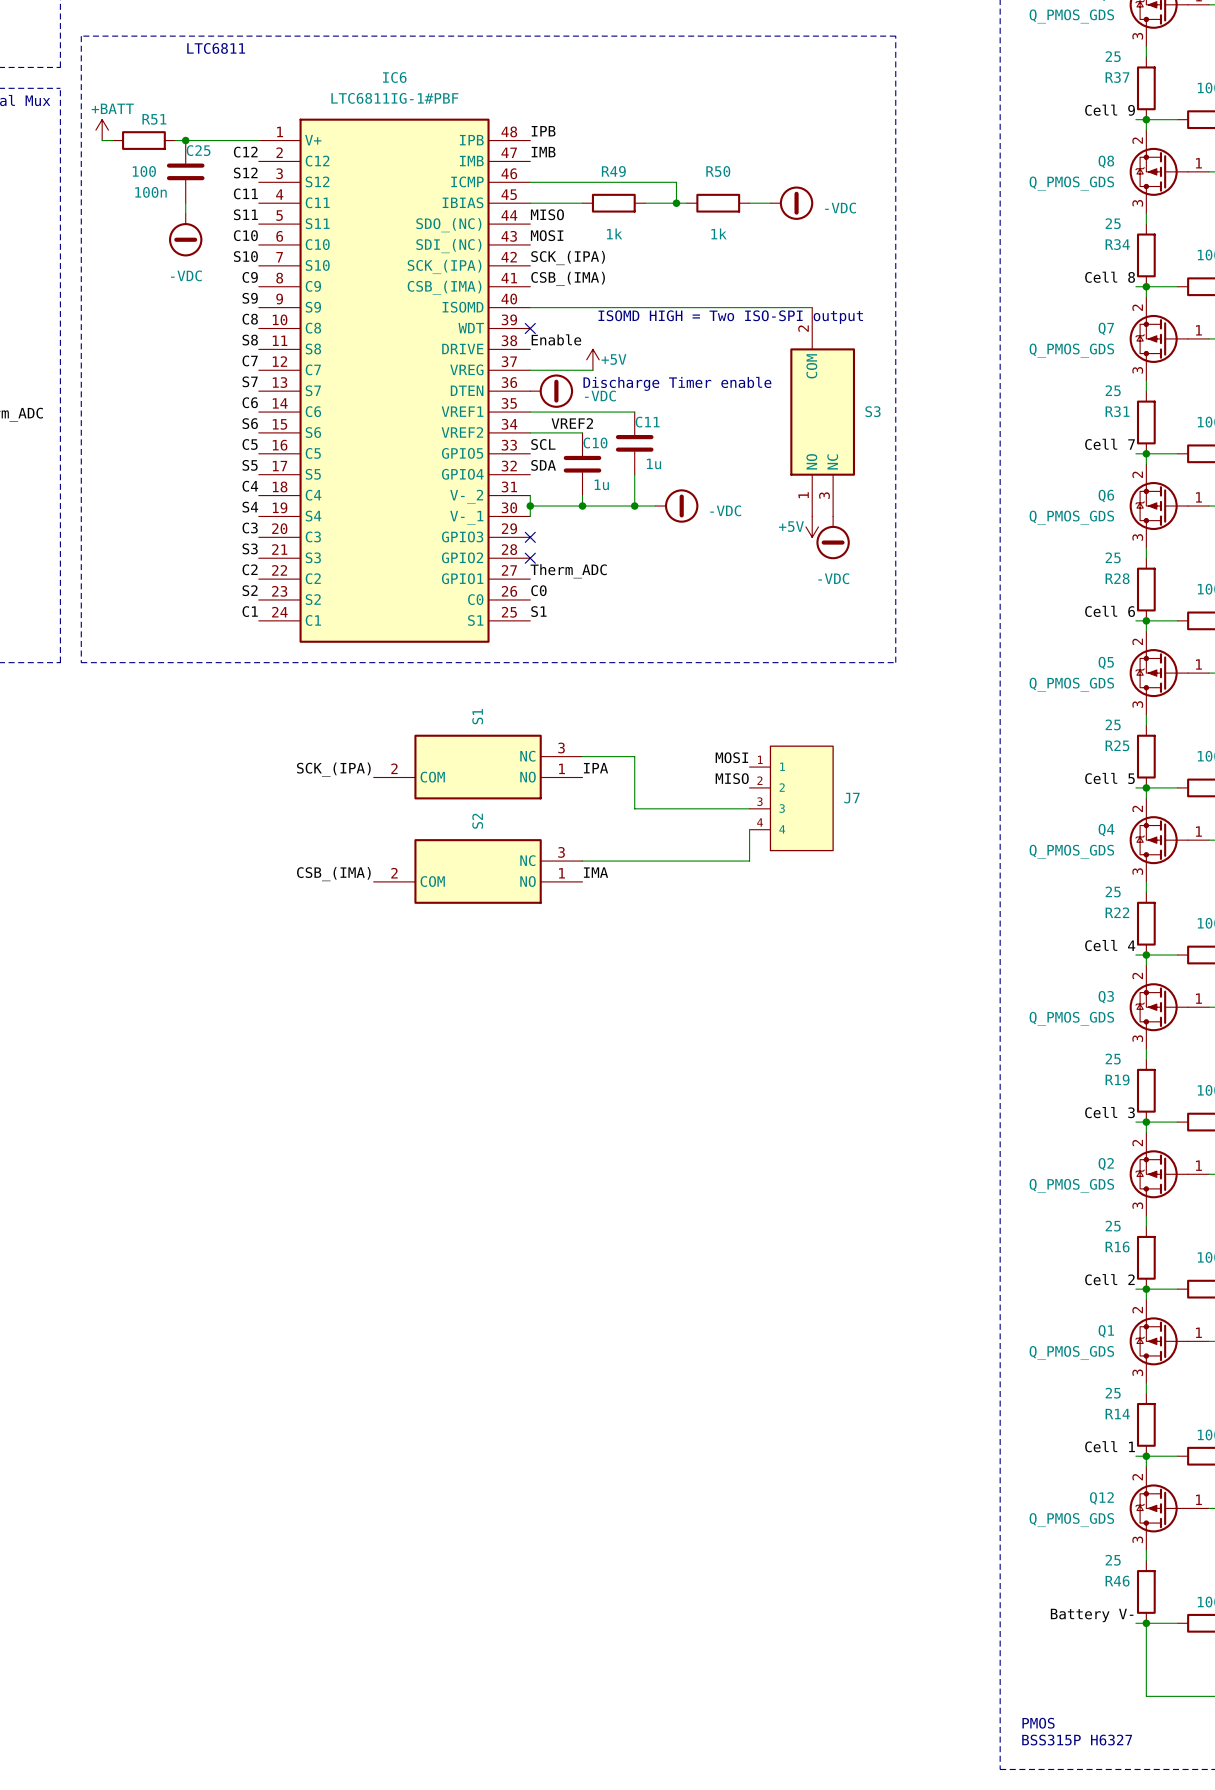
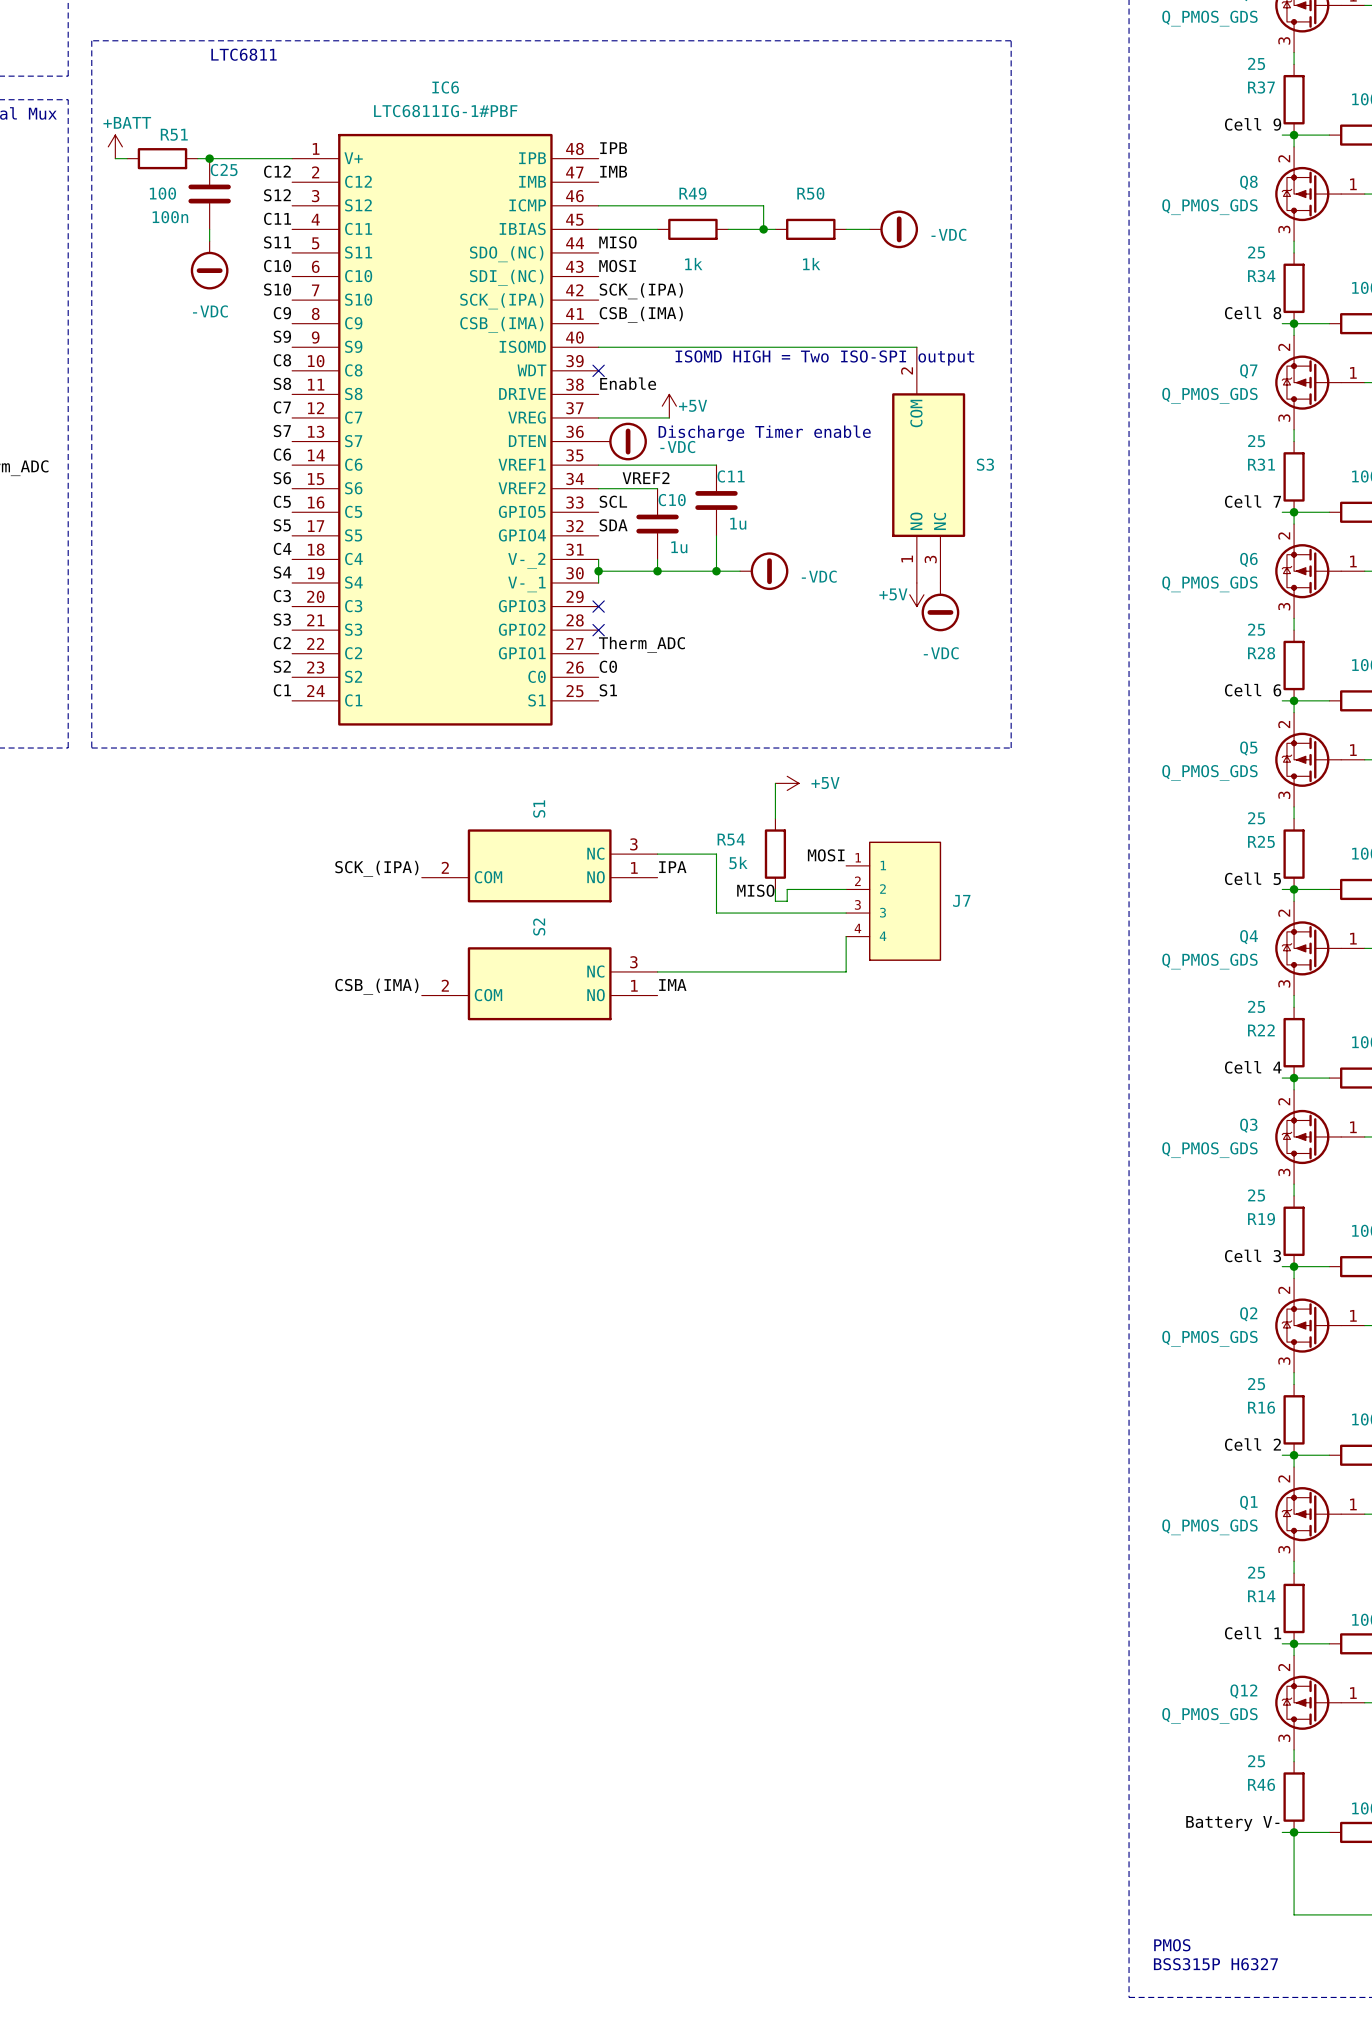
wire: none -> (775, 783) (775, 818)
power symbol: none -> +5V (787, 783)
R54: none -> 5k (775, 854)
label position: MISO (732, 778) -> MISO (755, 890)
wire: none -> (775, 889) (775, 901) (787, 901) (787, 889) (846, 889)

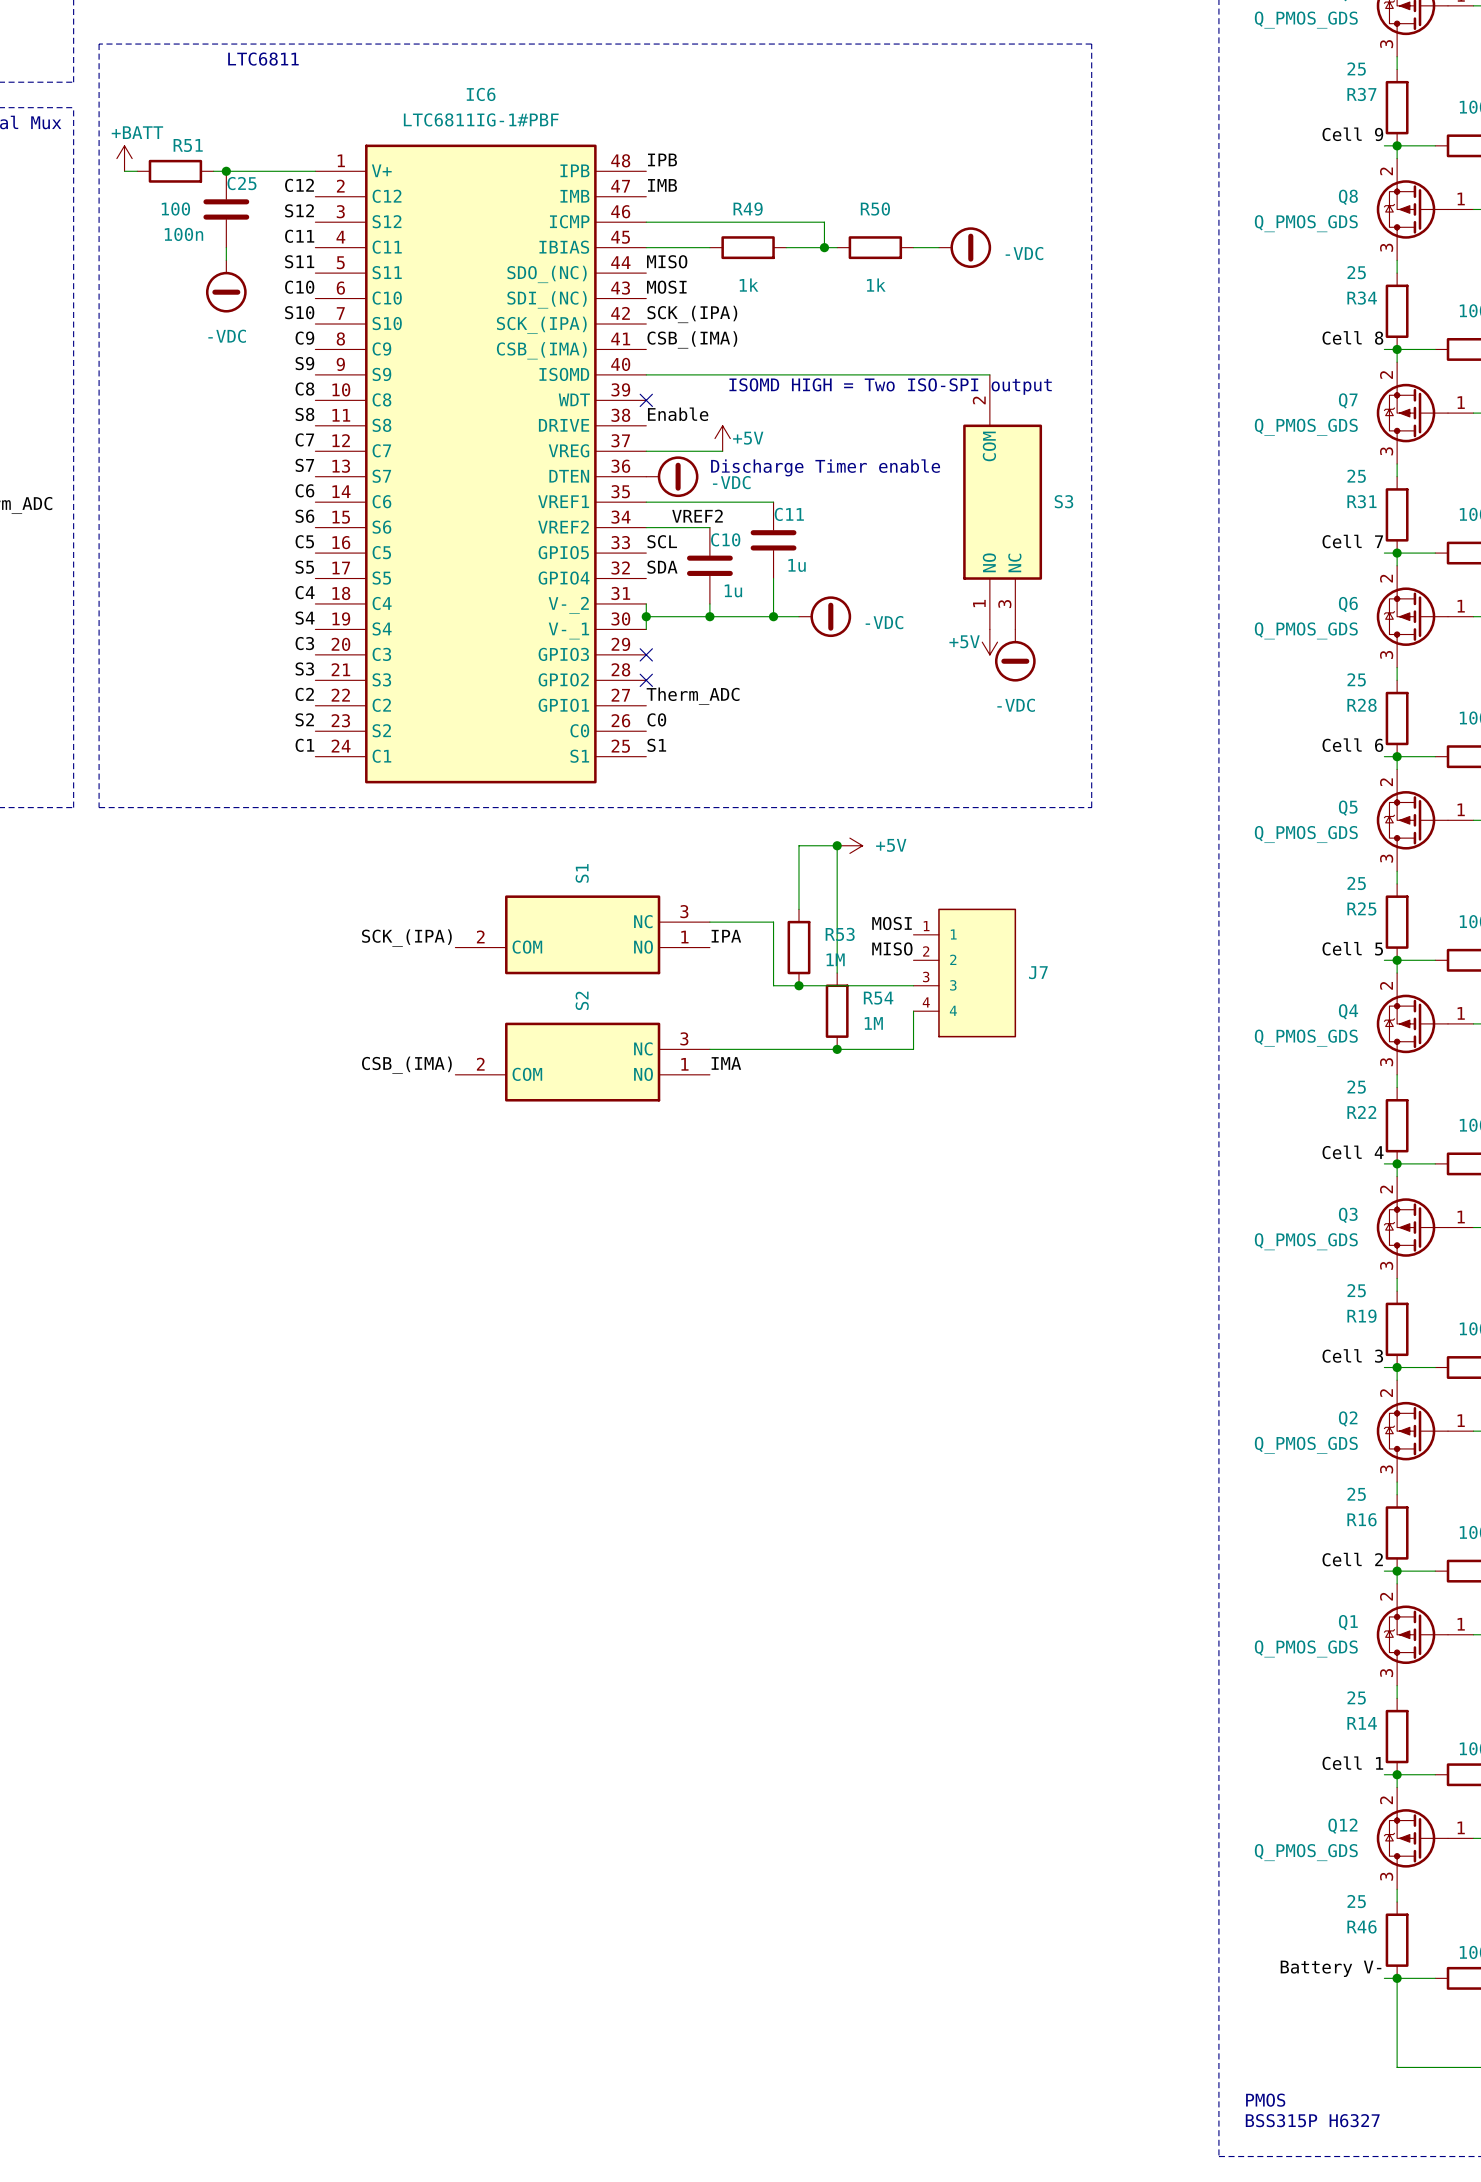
wire: none -> (837, 845) (798, 845) (798, 909)
junction: none -> (837, 845)
wire: none -> (837, 883) (837, 960)
R54 name position: R54 (731, 839) -> R54 (878, 998)
R54 position: (775, 854) -> (837, 1011)
R54 value: 5k (738, 862) -> 1M (873, 1023)
R53: none -> 1M (798, 947)
wire: (846, 889) (787, 889) (787, 901) (775, 901) -> none
label position: MISO (755, 890) -> MISO (892, 948)
junction: none -> (798, 985)
junction: none -> (837, 1049)

